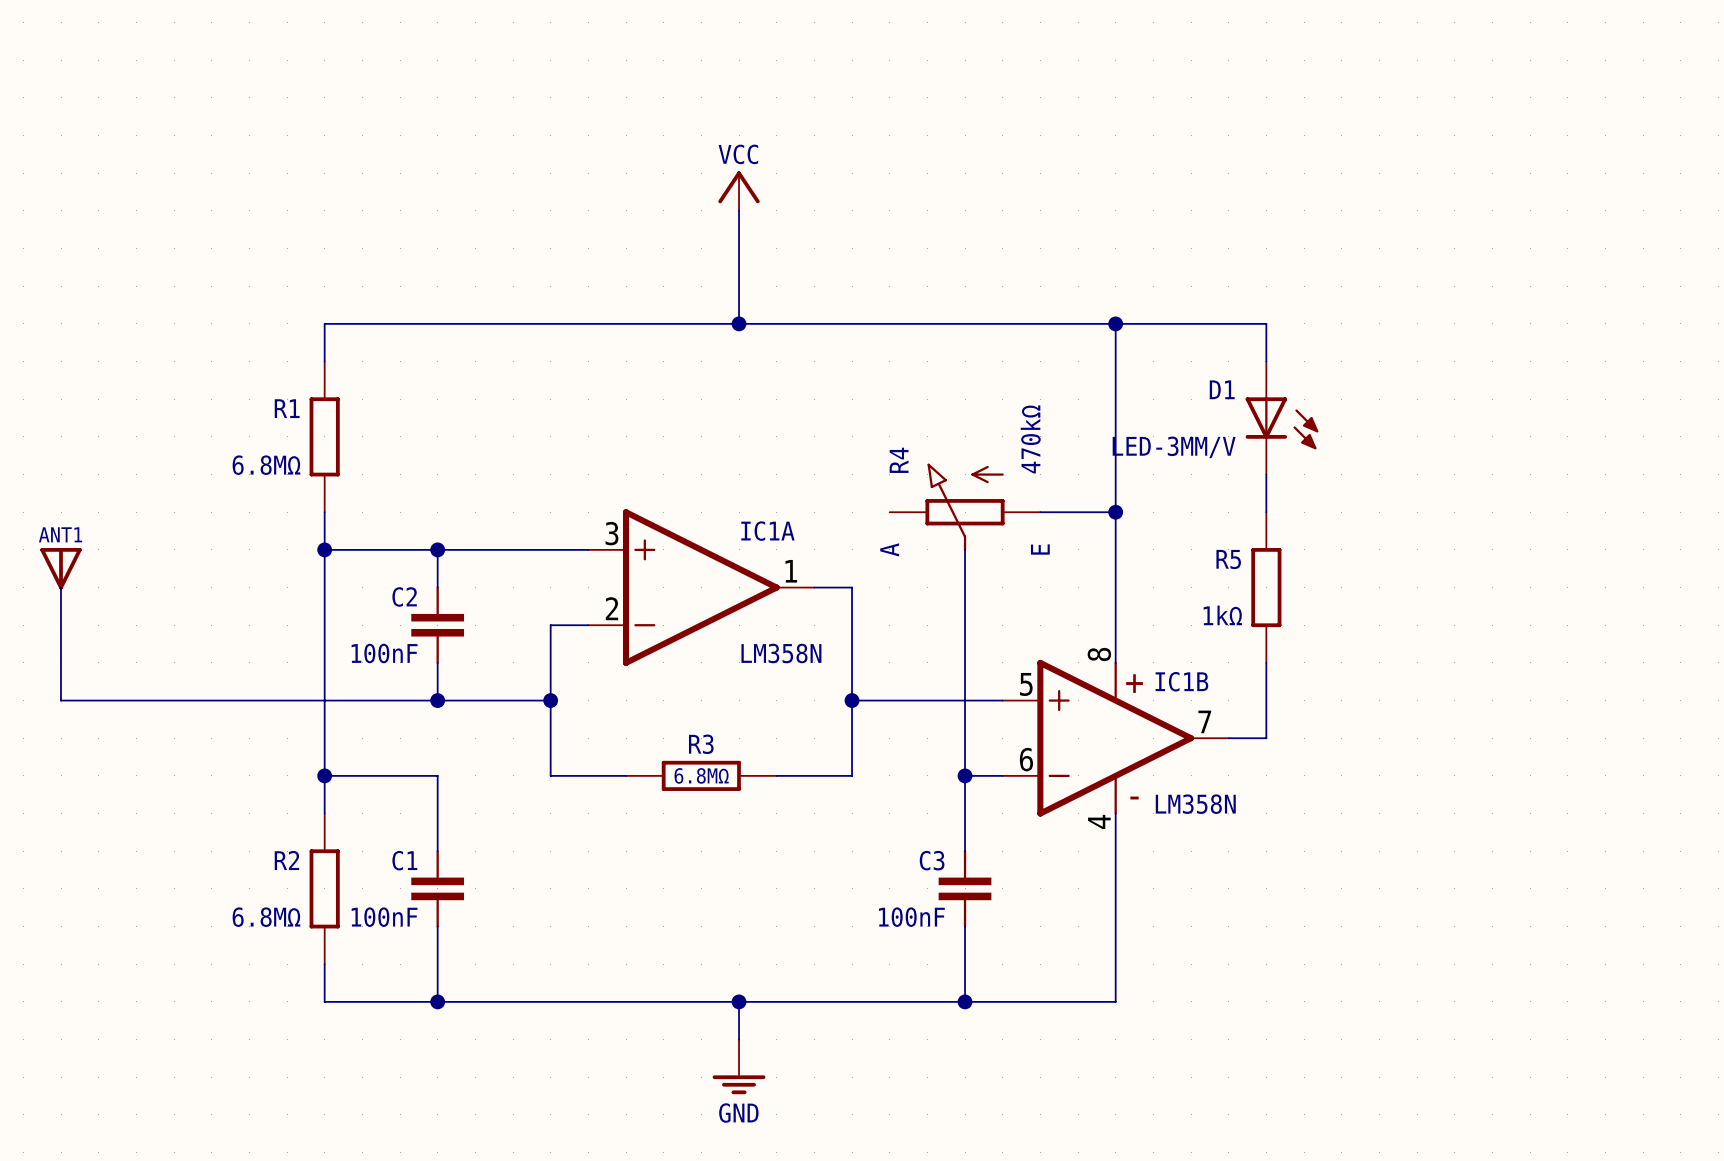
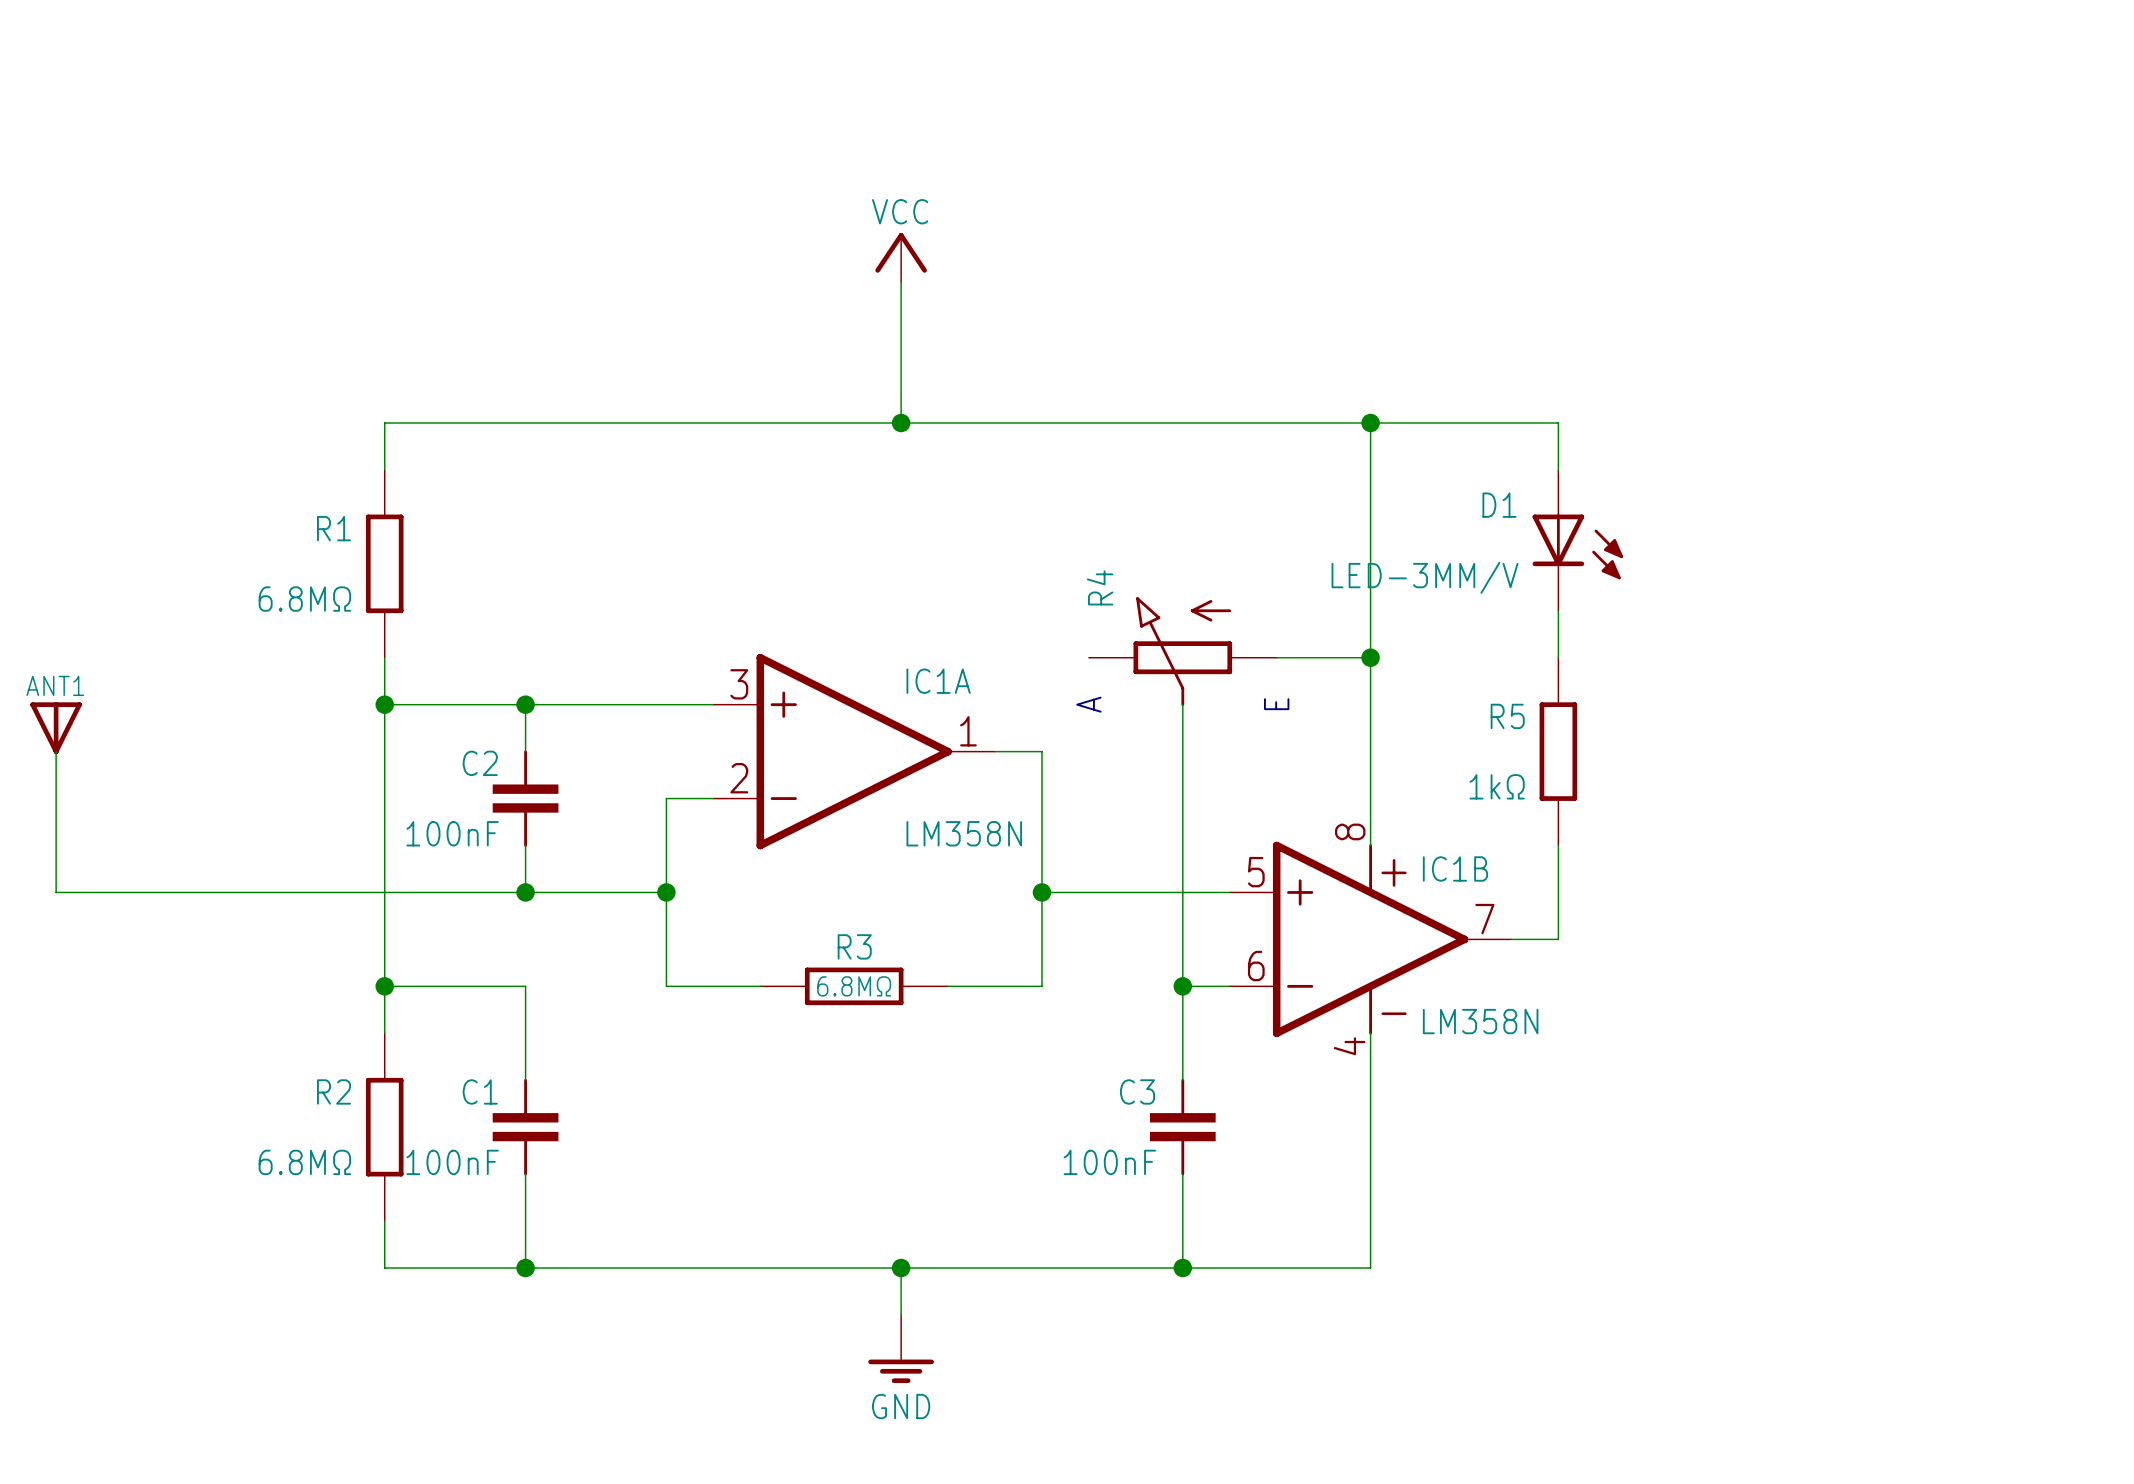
R4 value: 470kΩ (1030, 439) -> none

